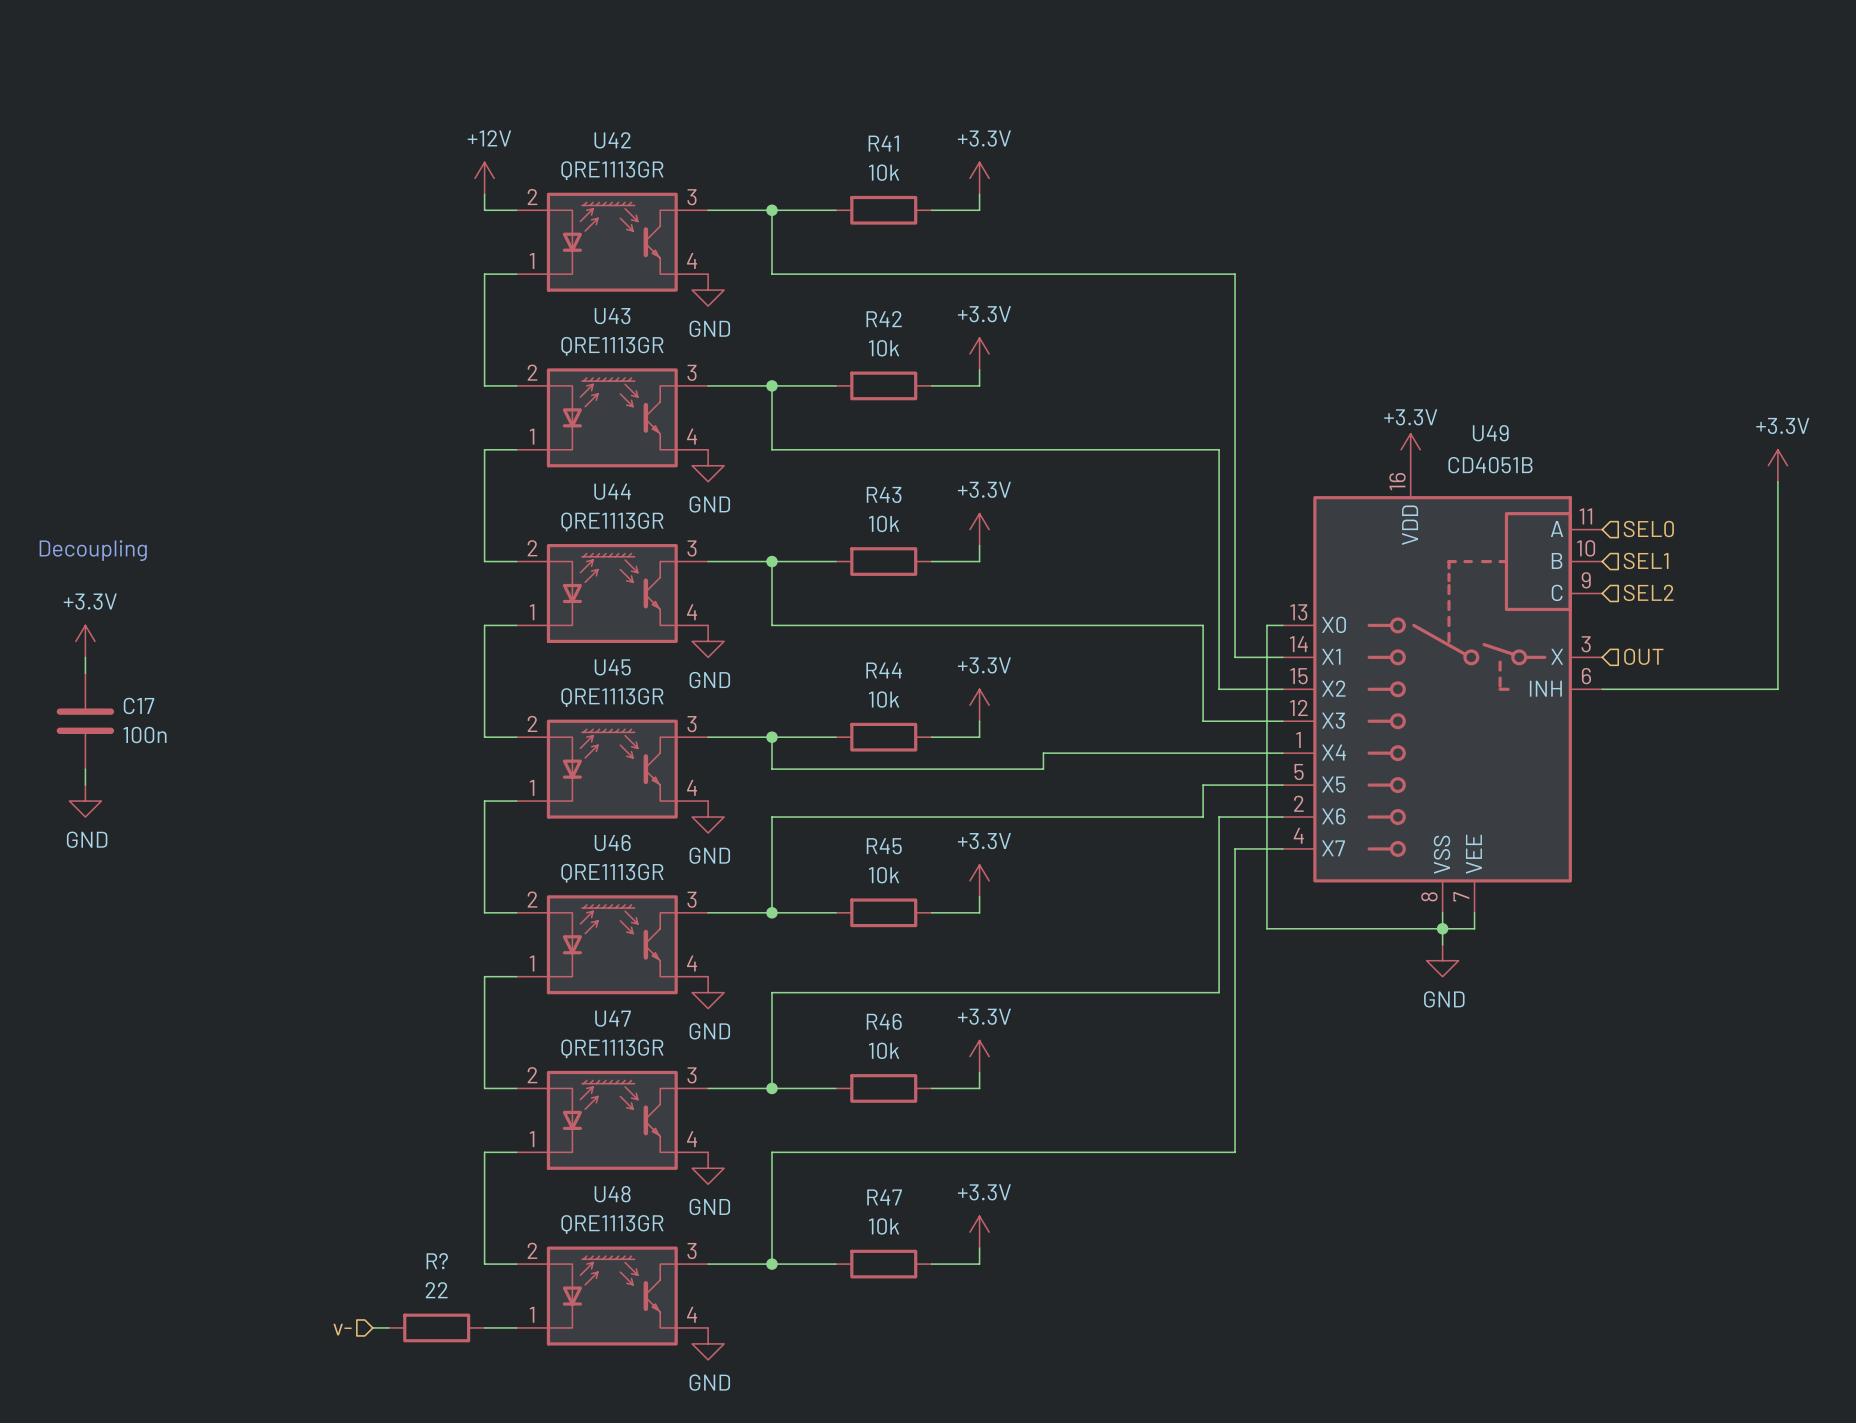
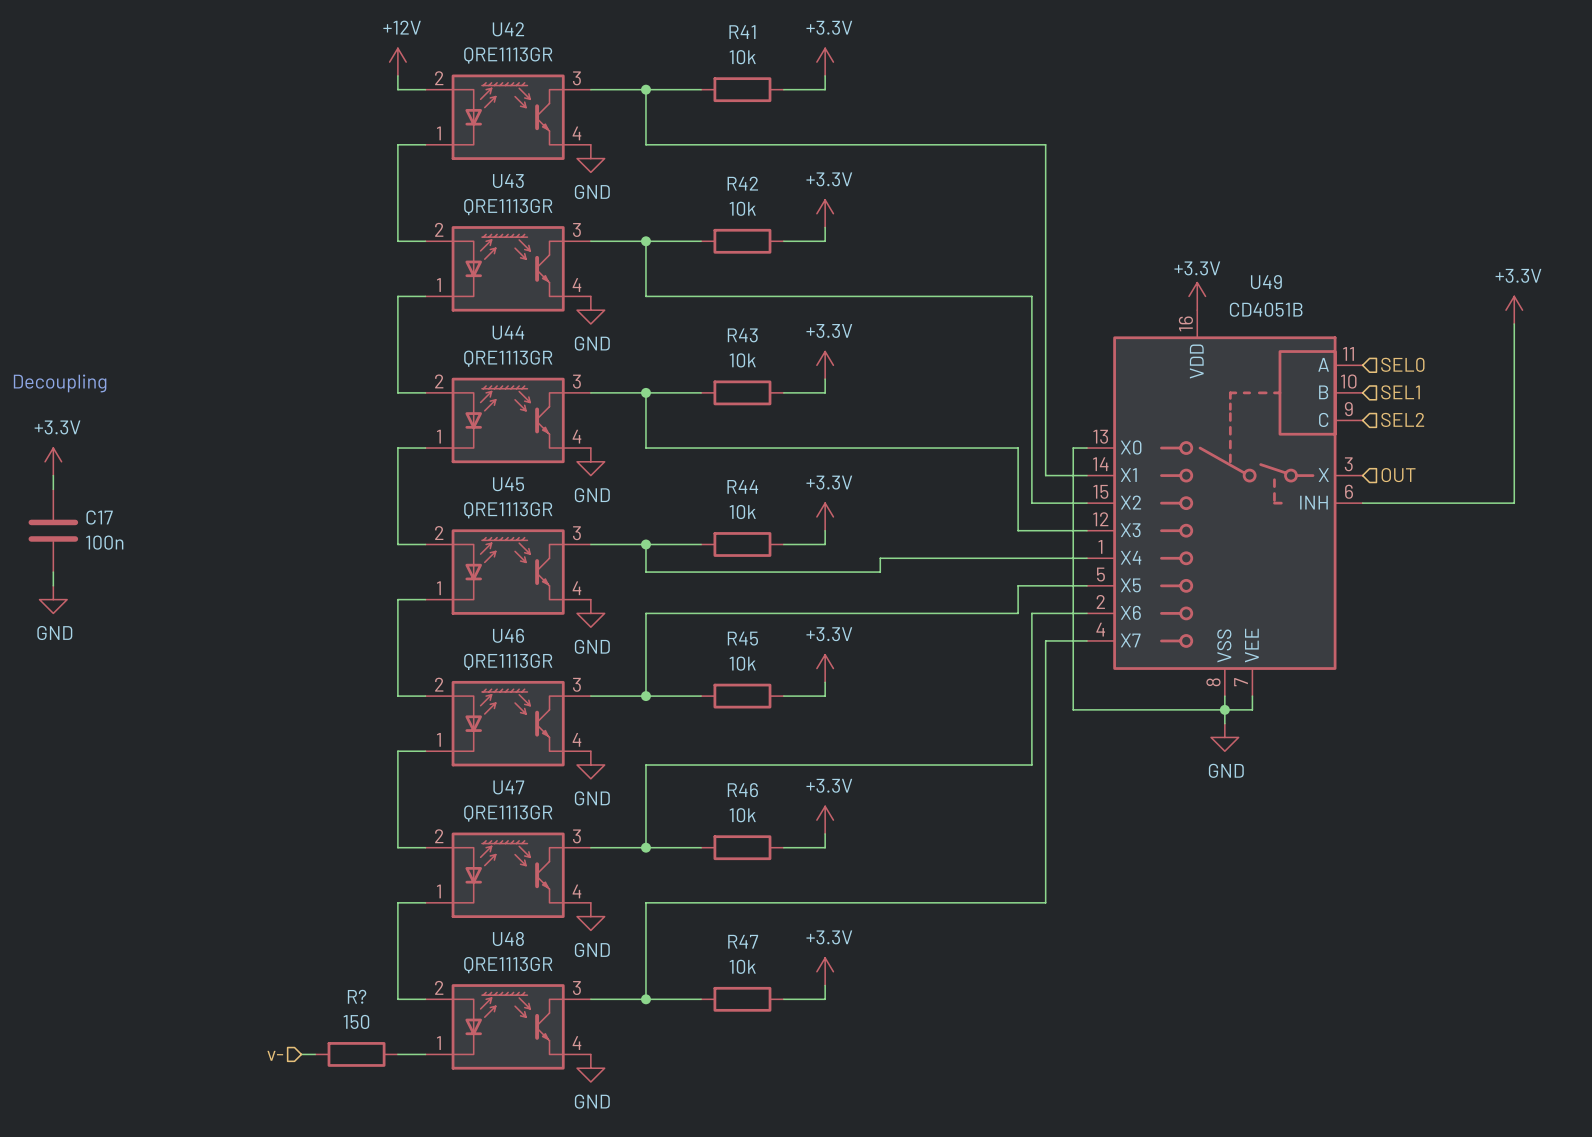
R? value: 22 (436, 1290) -> 150 (356, 1021)

